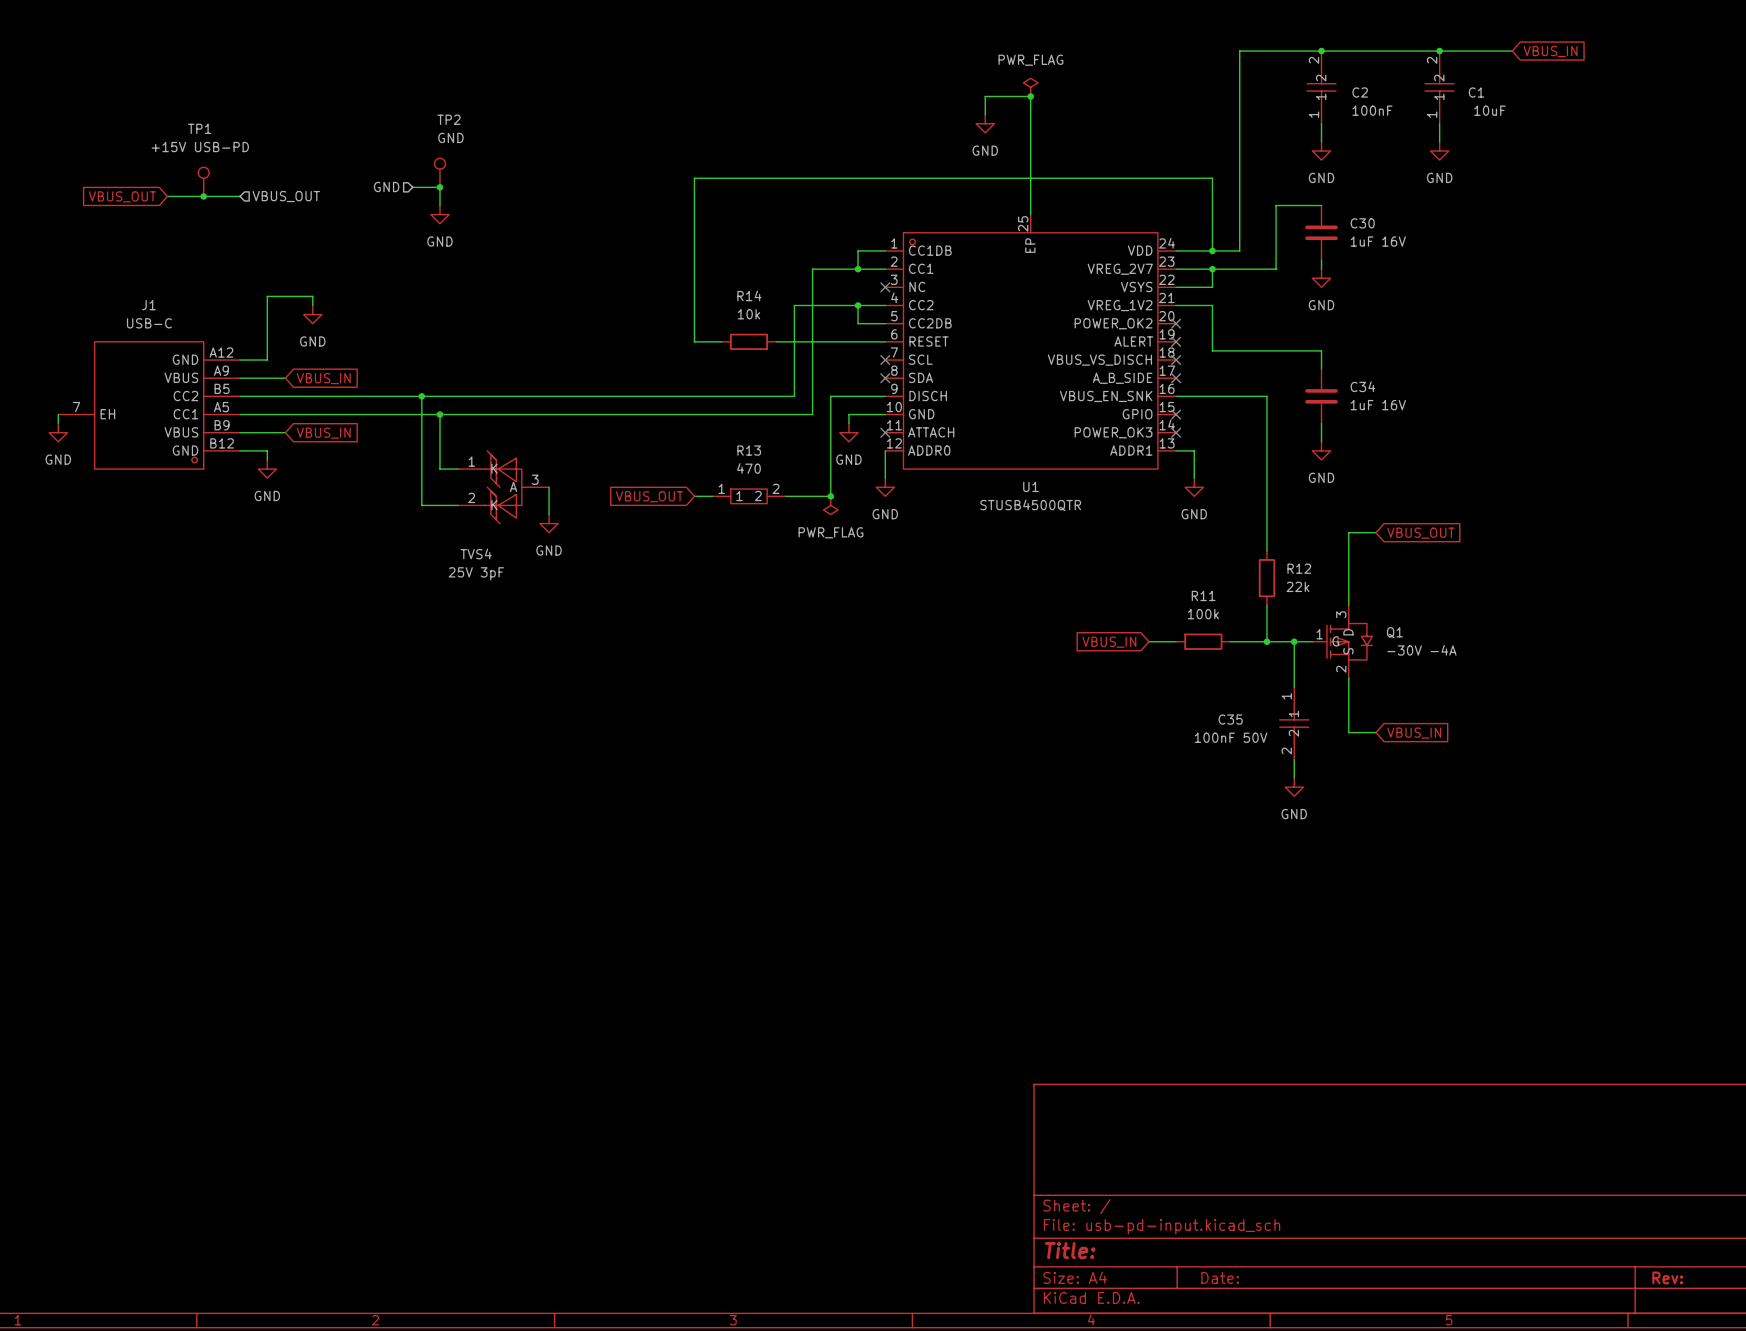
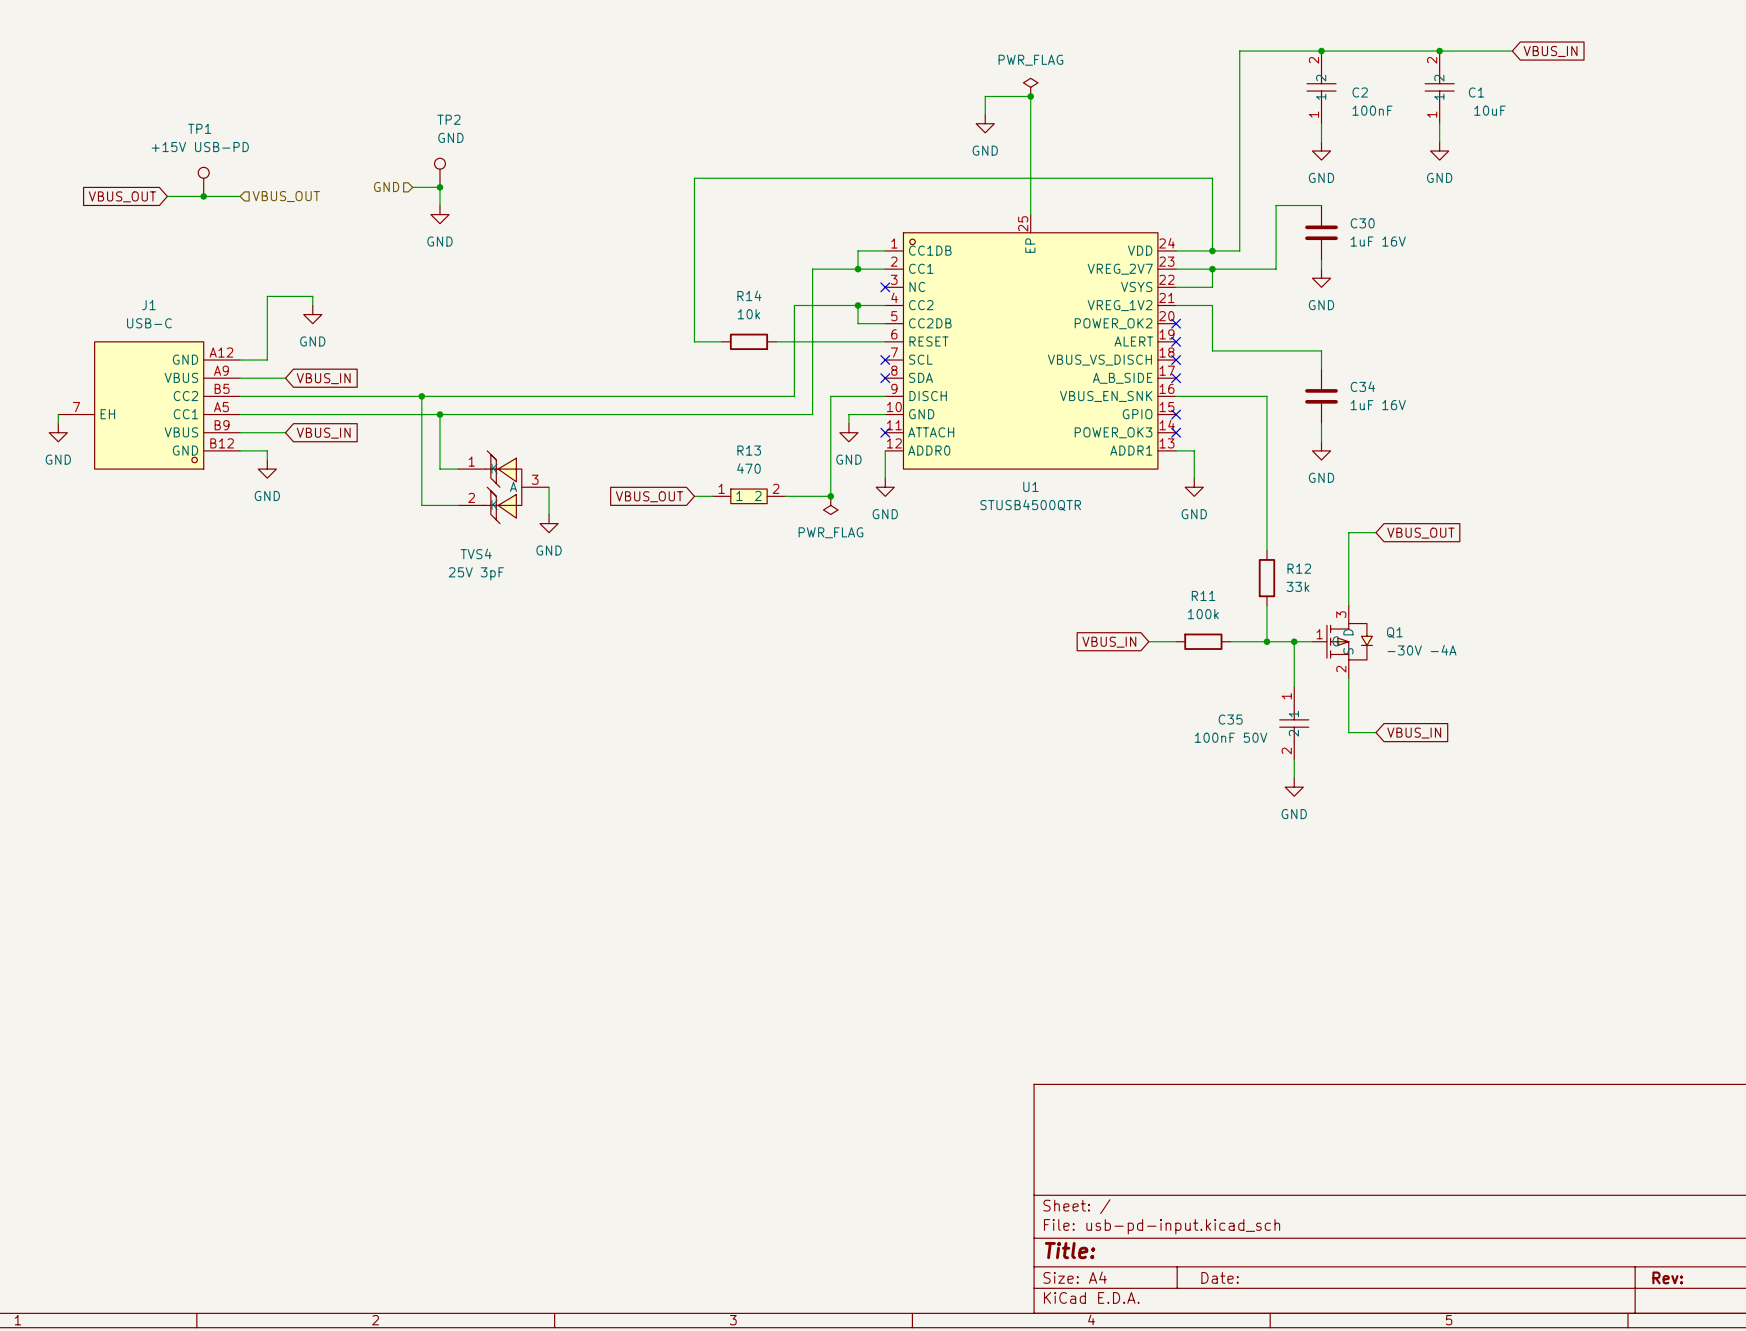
R12 value: 22k (1297, 586) -> 33k (1297, 586)

